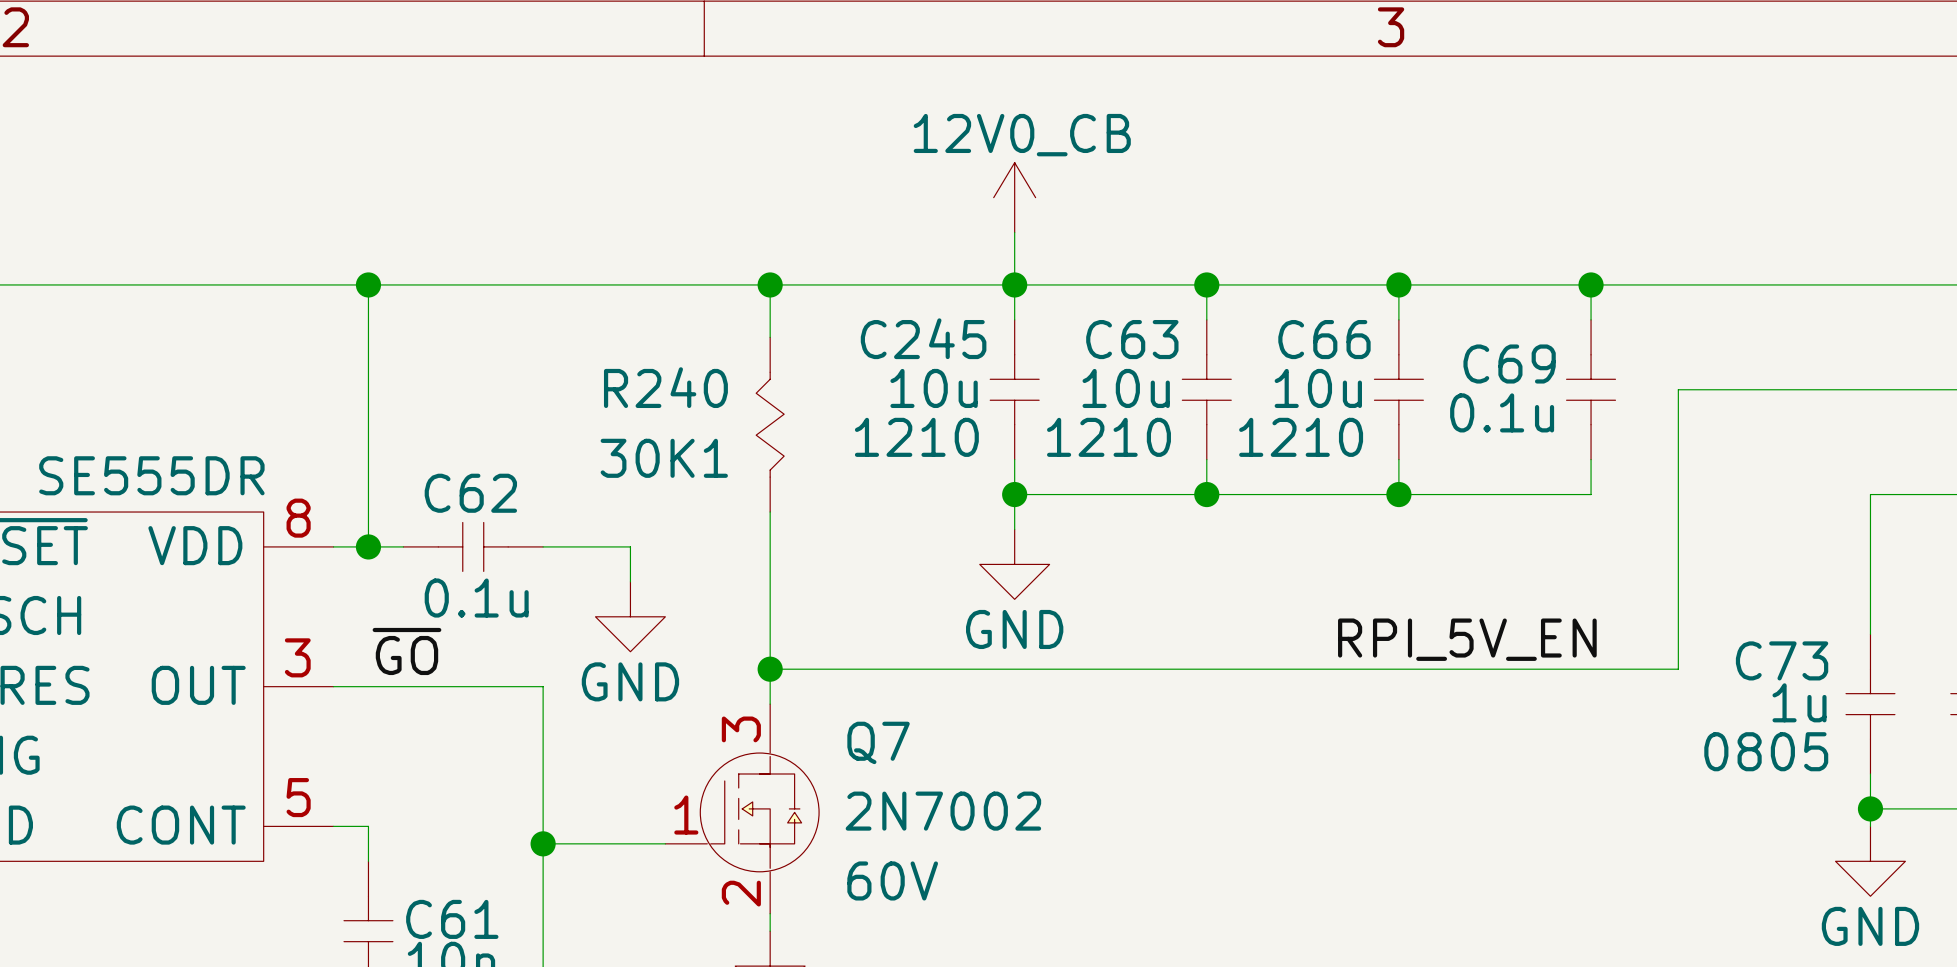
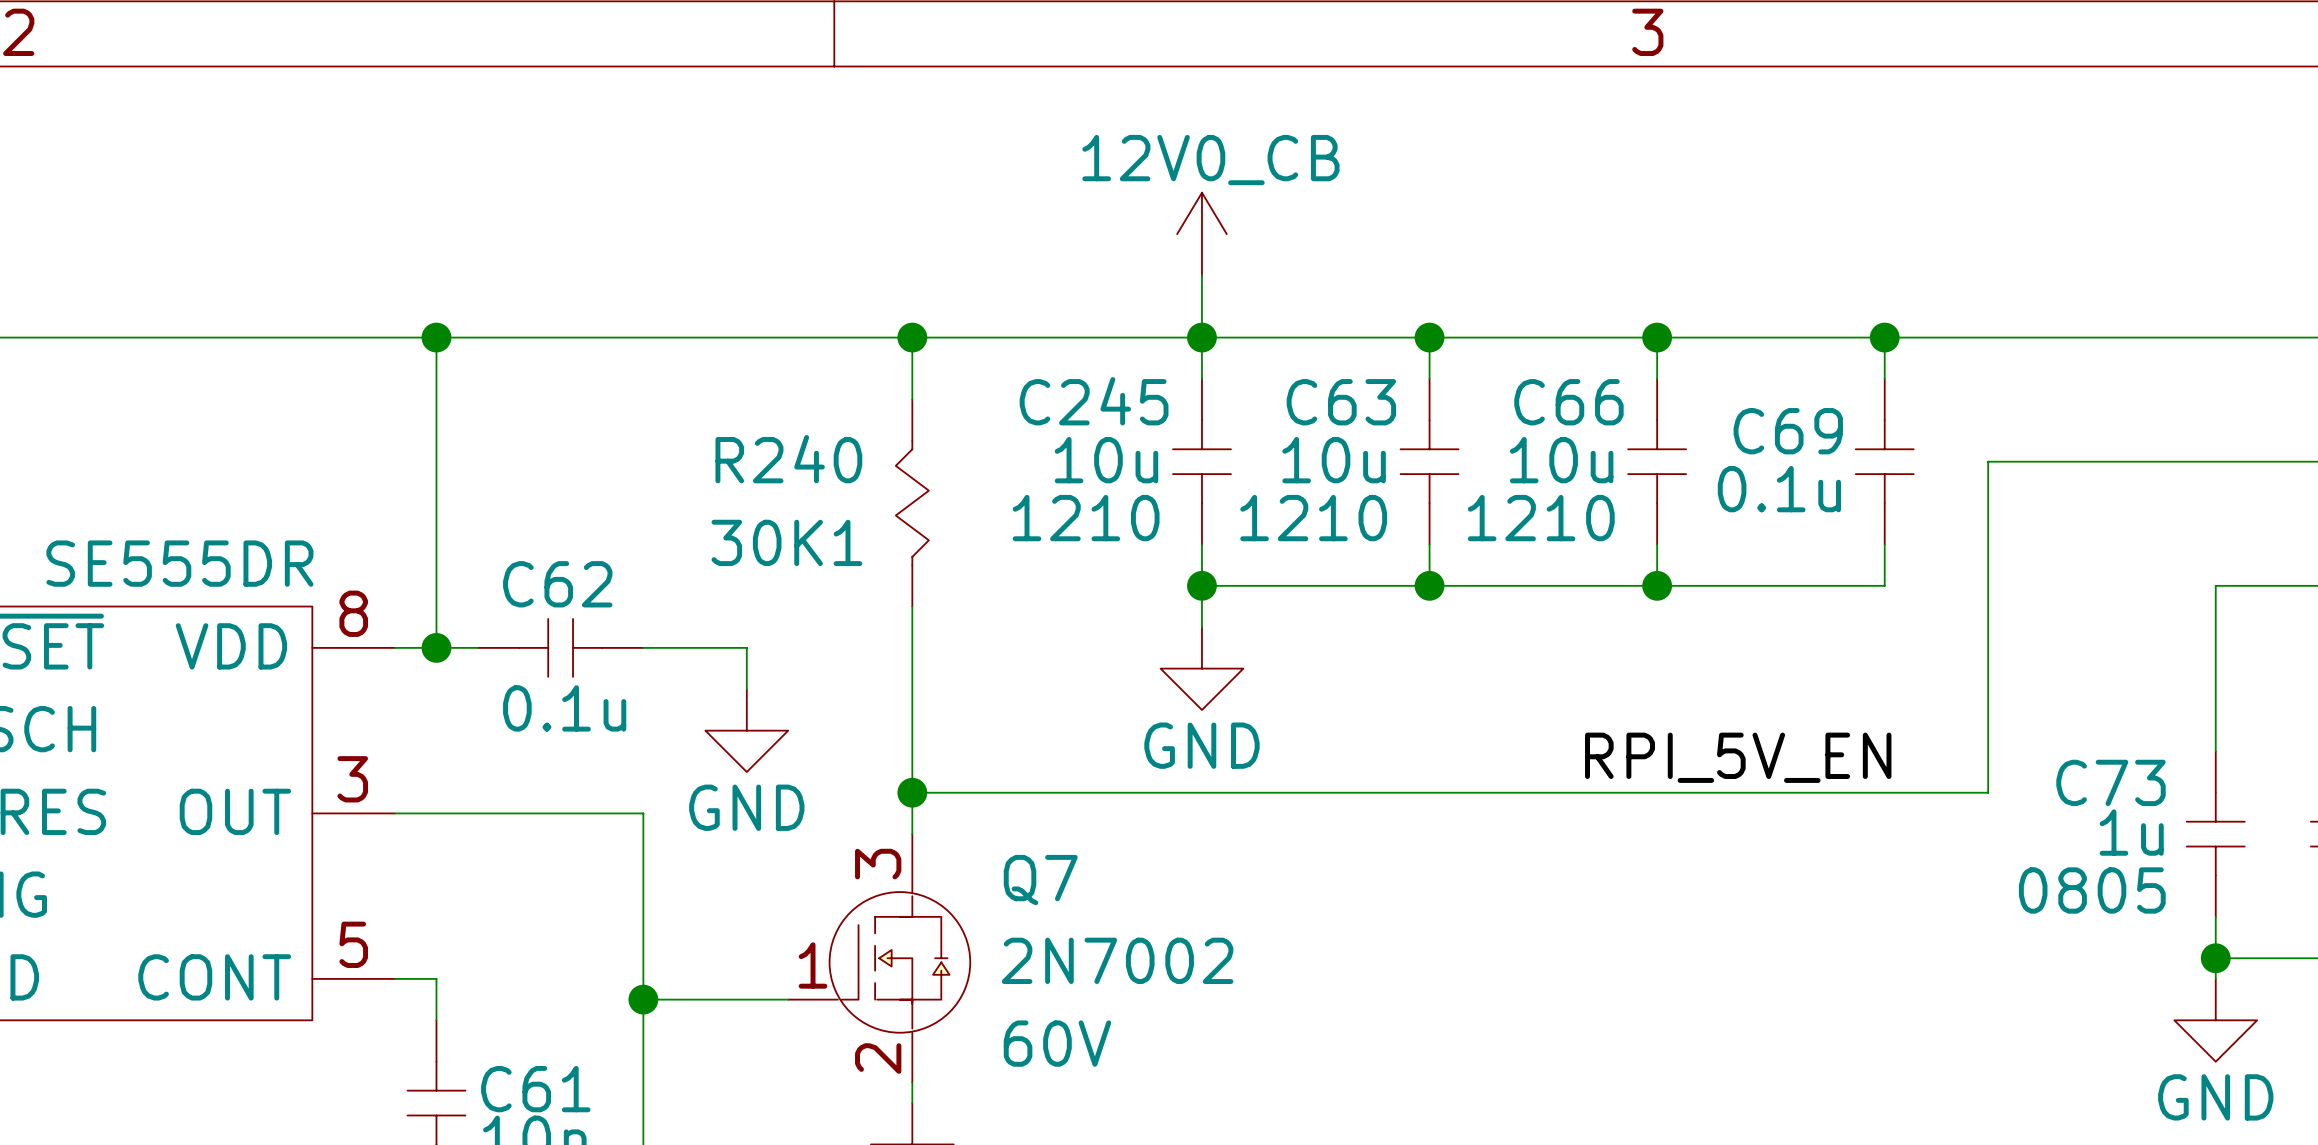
label: ~{GO} (406, 651) -> none

